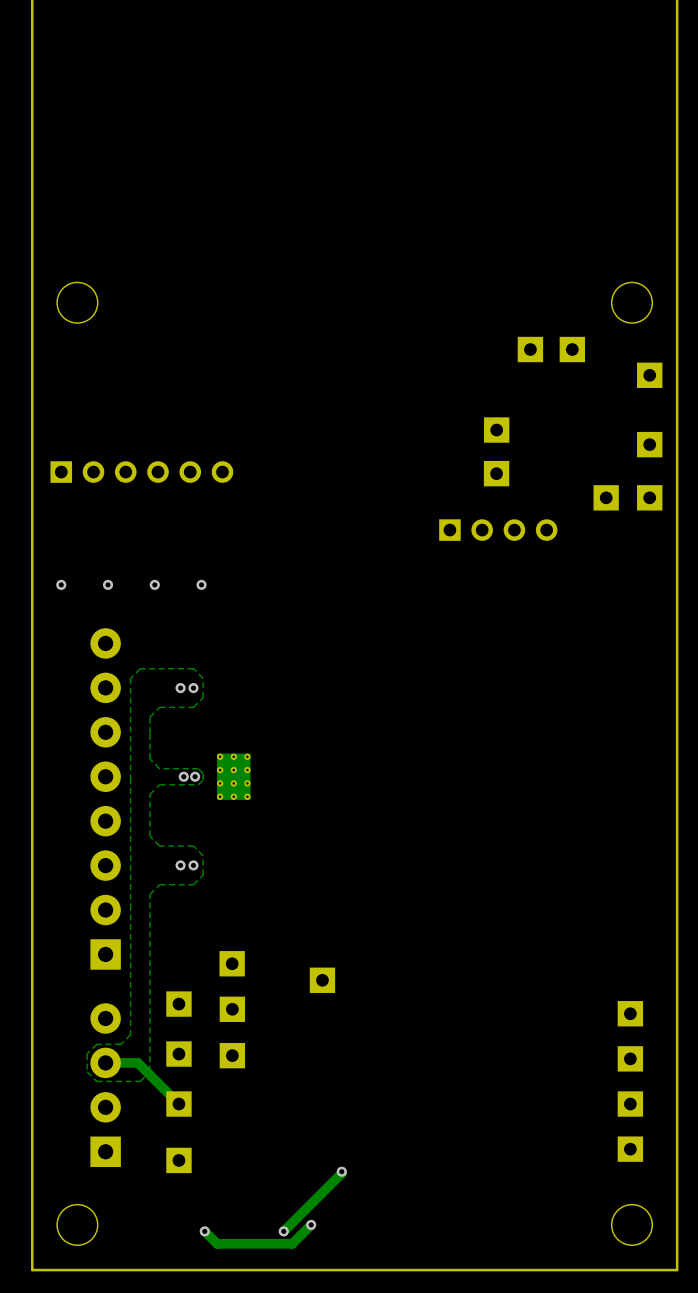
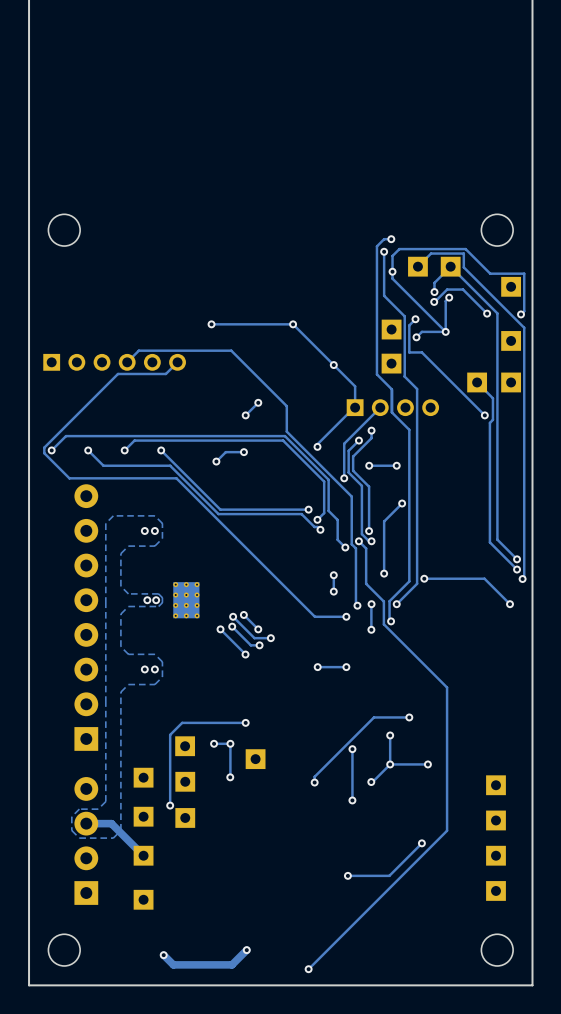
track: none -> (391, 239) (384, 239) (376, 246) (376, 374) (391, 389) (391, 412) (409, 429) (409, 581) (389, 601) (391, 621)
via: none -> (391, 239)
track: none -> (384, 251) (384, 295) (404, 316) (404, 376)
via: none -> (384, 251)
track: none -> (417, 266) (431, 253) (463, 253) (463, 267) (524, 327) (524, 577) (522, 579)
via: none -> (392, 271)
track: none -> (434, 292) (434, 282) (450, 266) (497, 313) (497, 539) (517, 559)
via: none -> (434, 292)
track: none -> (449, 297) (445, 301) (445, 331)
via: none -> (449, 297)
track: none -> (434, 301) (447, 289) (463, 289) (487, 313)
via: none -> (434, 301)
via: none -> (487, 313)
track: none -> (521, 314) (524, 311) (524, 273) (490, 273) (465, 249) (399, 249) (392, 255) (392, 278) (445, 331)
via: none -> (521, 314)
track: none -> (415, 319) (409, 325) (409, 352) (421, 352) (484, 415)
via: none -> (415, 319)
track: none -> (211, 324) (293, 324) (355, 386) (355, 407) (317, 444) (317, 446)
via: none -> (211, 324)
via: none -> (293, 324)
track: none -> (445, 331) (421, 331) (416, 337)
via: none -> (445, 331)
via: none -> (416, 337)
track: none -> (127, 362) (138, 350) (231, 350) (286, 406) (286, 431) (351, 496) (351, 544) (355, 548) (357, 605)
track: none -> (177, 362) (165, 373) (117, 373) (44, 447) (44, 453) (69, 478) (176, 478) (314, 616) (346, 616)
via: none -> (333, 365)
track: none -> (404, 376) (417, 389) (417, 583) (396, 604)
track: none -> (477, 382) (492, 398) (492, 419) (489, 422) (489, 542) (517, 569)
track: none -> (258, 402) (245, 415)
via: none -> (258, 402)
track: none -> (380, 407) (344, 443) (344, 478)
via: none -> (245, 415)
via: none -> (484, 415)
track: none -> (371, 430) (371, 438) (353, 456) (353, 470) (369, 486) (369, 531)
via: none -> (371, 430)
track: none -> (358, 440) (348, 450) (348, 472) (361, 485) (361, 534) (371, 541)
via: none -> (358, 440)
via: none -> (317, 446)
track: none -> (51, 450) (66, 436) (284, 436) (328, 479) (328, 510) (337, 519) (337, 539) (345, 547)
track: none -> (88, 450) (103, 465) (170, 465) (218, 514) (301, 514) (314, 527) (320, 529)
track: none -> (124, 450) (134, 440) (283, 440) (324, 481) (324, 513) (317, 519)
track: none -> (161, 450) (220, 509) (308, 509)
track: none -> (243, 452) (225, 452) (216, 461)
via: none -> (243, 452)
via: none -> (216, 461)
via: none -> (369, 465)
track: none -> (396, 465) (369, 465)
via: none -> (396, 465)
via: none -> (344, 478)
track: none -> (402, 503) (384, 521) (384, 573)
via: none -> (402, 503)
via: none -> (308, 509)
via: none -> (317, 519)
via: none -> (320, 529)
via: none -> (369, 531)
track: none -> (358, 541) (366, 548) (366, 583) (383, 601) (383, 624) (447, 687) (447, 830) (308, 969)
via: none -> (358, 541)
via: none -> (371, 541)
via: none -> (345, 547)
via: none -> (517, 559)
via: none -> (517, 569)
via: none -> (384, 573)
track: none -> (333, 575) (333, 591)
via: none -> (333, 575)
track: none -> (424, 578) (484, 578) (510, 604)
via: none -> (424, 578)
via: none -> (522, 579)
via: none -> (333, 591)
track: none -> (371, 604) (371, 629)
via: none -> (371, 604)
via: none -> (396, 604)
via: none -> (510, 604)
via: none -> (357, 605)
track: none -> (243, 614) (258, 629)
via: none -> (243, 614)
track: none -> (233, 616) (254, 638) (270, 638)
via: none -> (233, 616)
via: none -> (346, 616)
via: none -> (391, 621)
track: none -> (232, 626) (250, 645) (259, 645)
via: none -> (232, 626)
track: none -> (220, 629) (245, 654)
via: none -> (220, 629)
via: none -> (258, 629)
via: none -> (371, 629)
via: none -> (270, 638)
via: none -> (259, 645)
via: none -> (245, 654)
via: none -> (317, 667)
track: none -> (346, 667) (317, 667)
via: none -> (346, 667)
track: none -> (409, 717) (373, 717) (314, 776) (314, 782)
via: none -> (409, 717)
track: none -> (245, 722) (182, 722) (170, 734) (170, 805)
via: none -> (245, 722)
track: none -> (390, 735) (390, 764)
via: none -> (390, 735)
track: none -> (214, 743) (230, 743) (230, 777)
via: none -> (214, 743)
via: none -> (230, 743)
track: none -> (352, 749) (352, 800)
via: none -> (352, 749)
track: none -> (390, 764) (371, 782)
via: none -> (390, 764)
track: none -> (427, 764) (390, 764)
via: none -> (427, 764)
via: none -> (230, 777)
via: none -> (371, 782)
via: none -> (314, 782)
via: none -> (352, 800)
via: none -> (170, 805)
track: none -> (421, 843) (389, 875) (347, 875)
via: none -> (421, 843)
via: none -> (347, 875)
track: (341, 1171) (283, 1231) -> none
via: (341, 1171) -> none
via: (283, 1231) -> none
via: none -> (308, 969)

